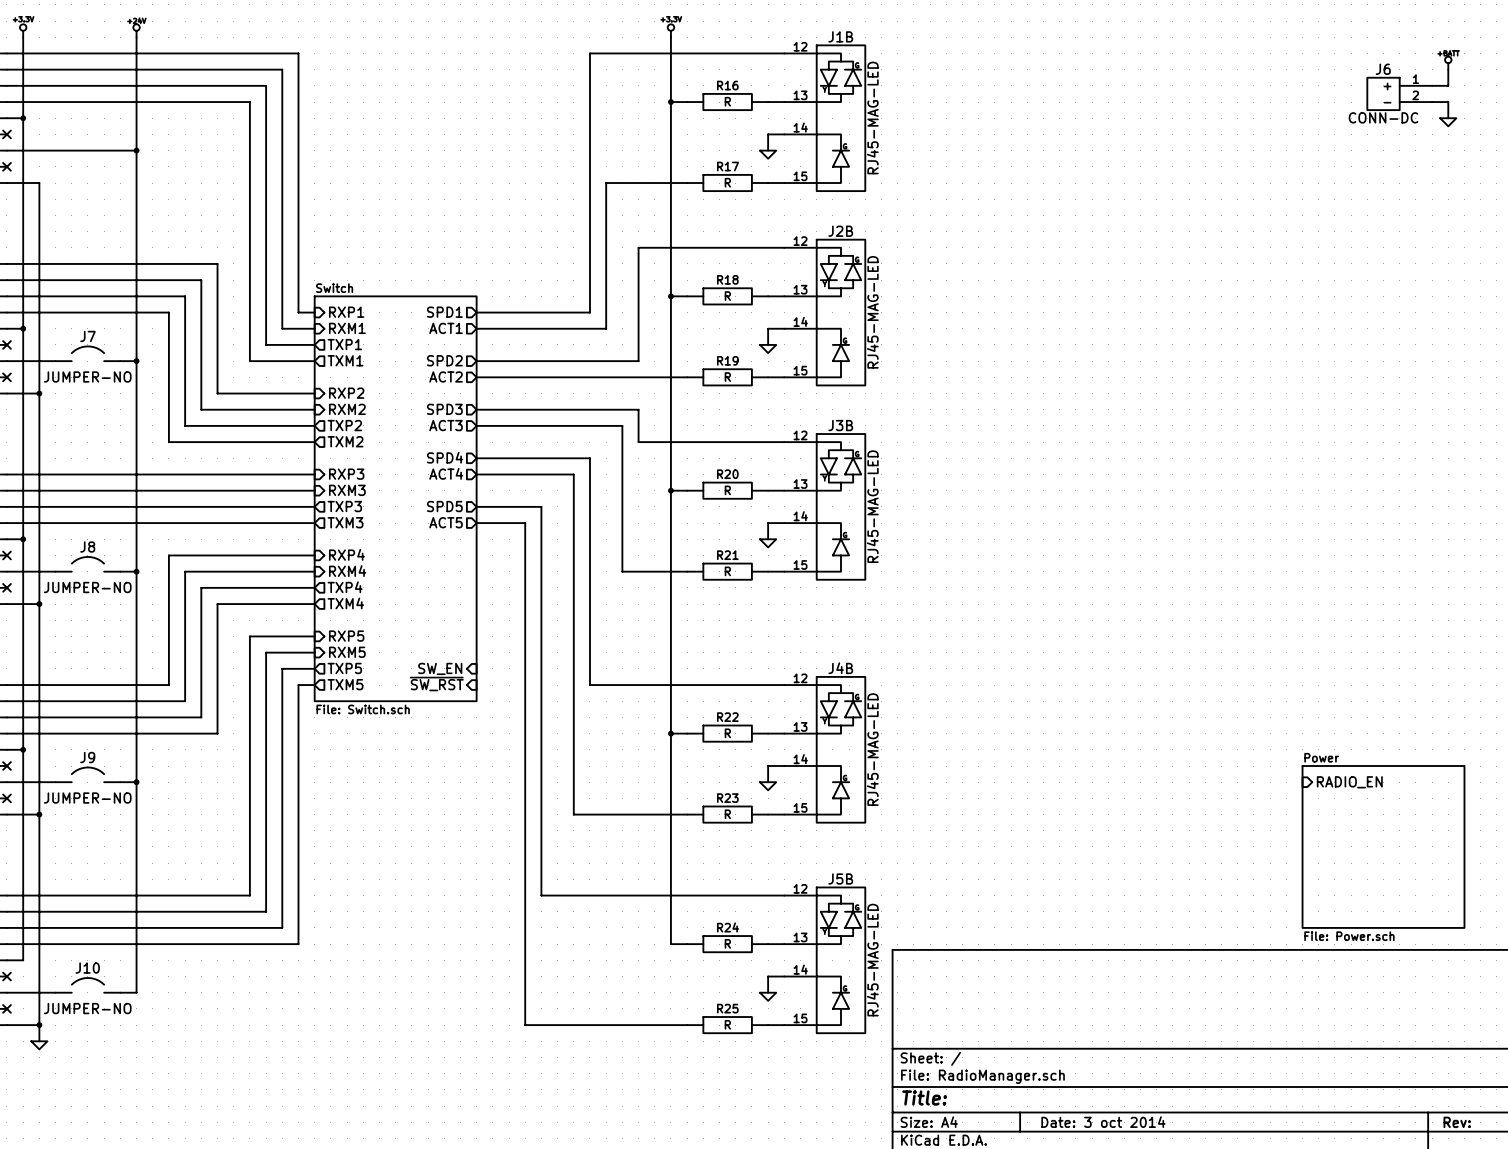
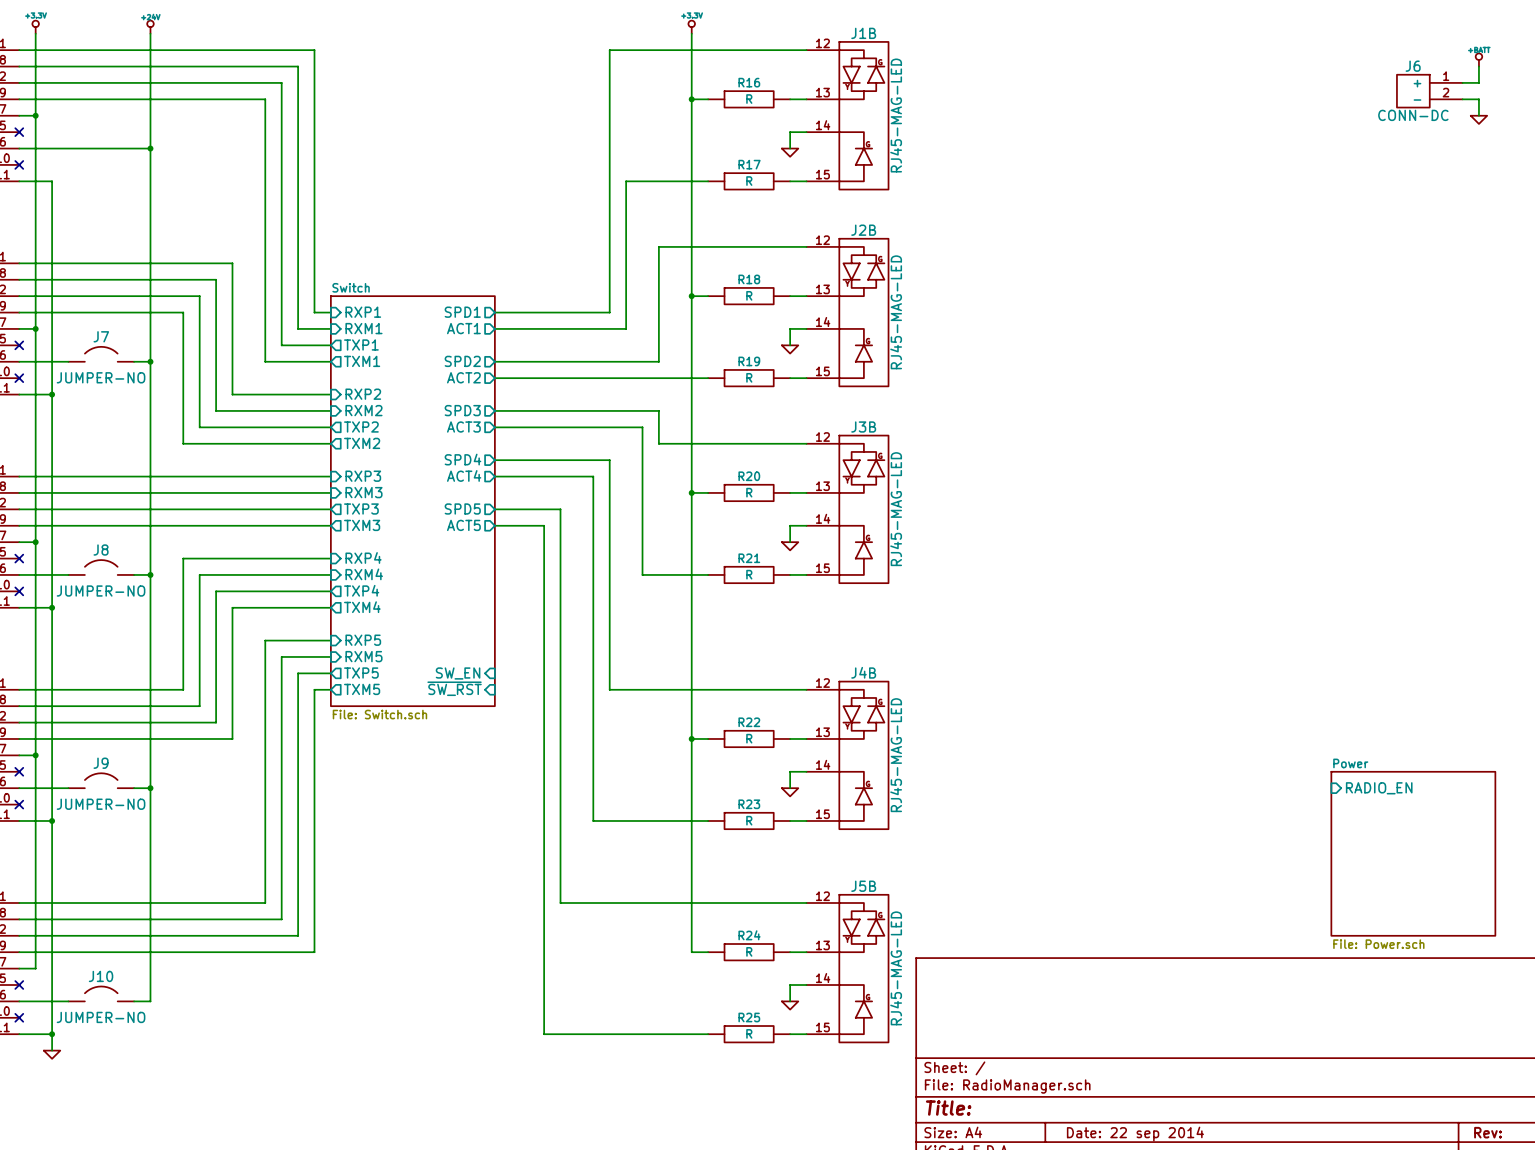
title block: Date: 3 oct 2014 (1103, 1122) -> Date: 22 sep 2014 (1135, 1134)

